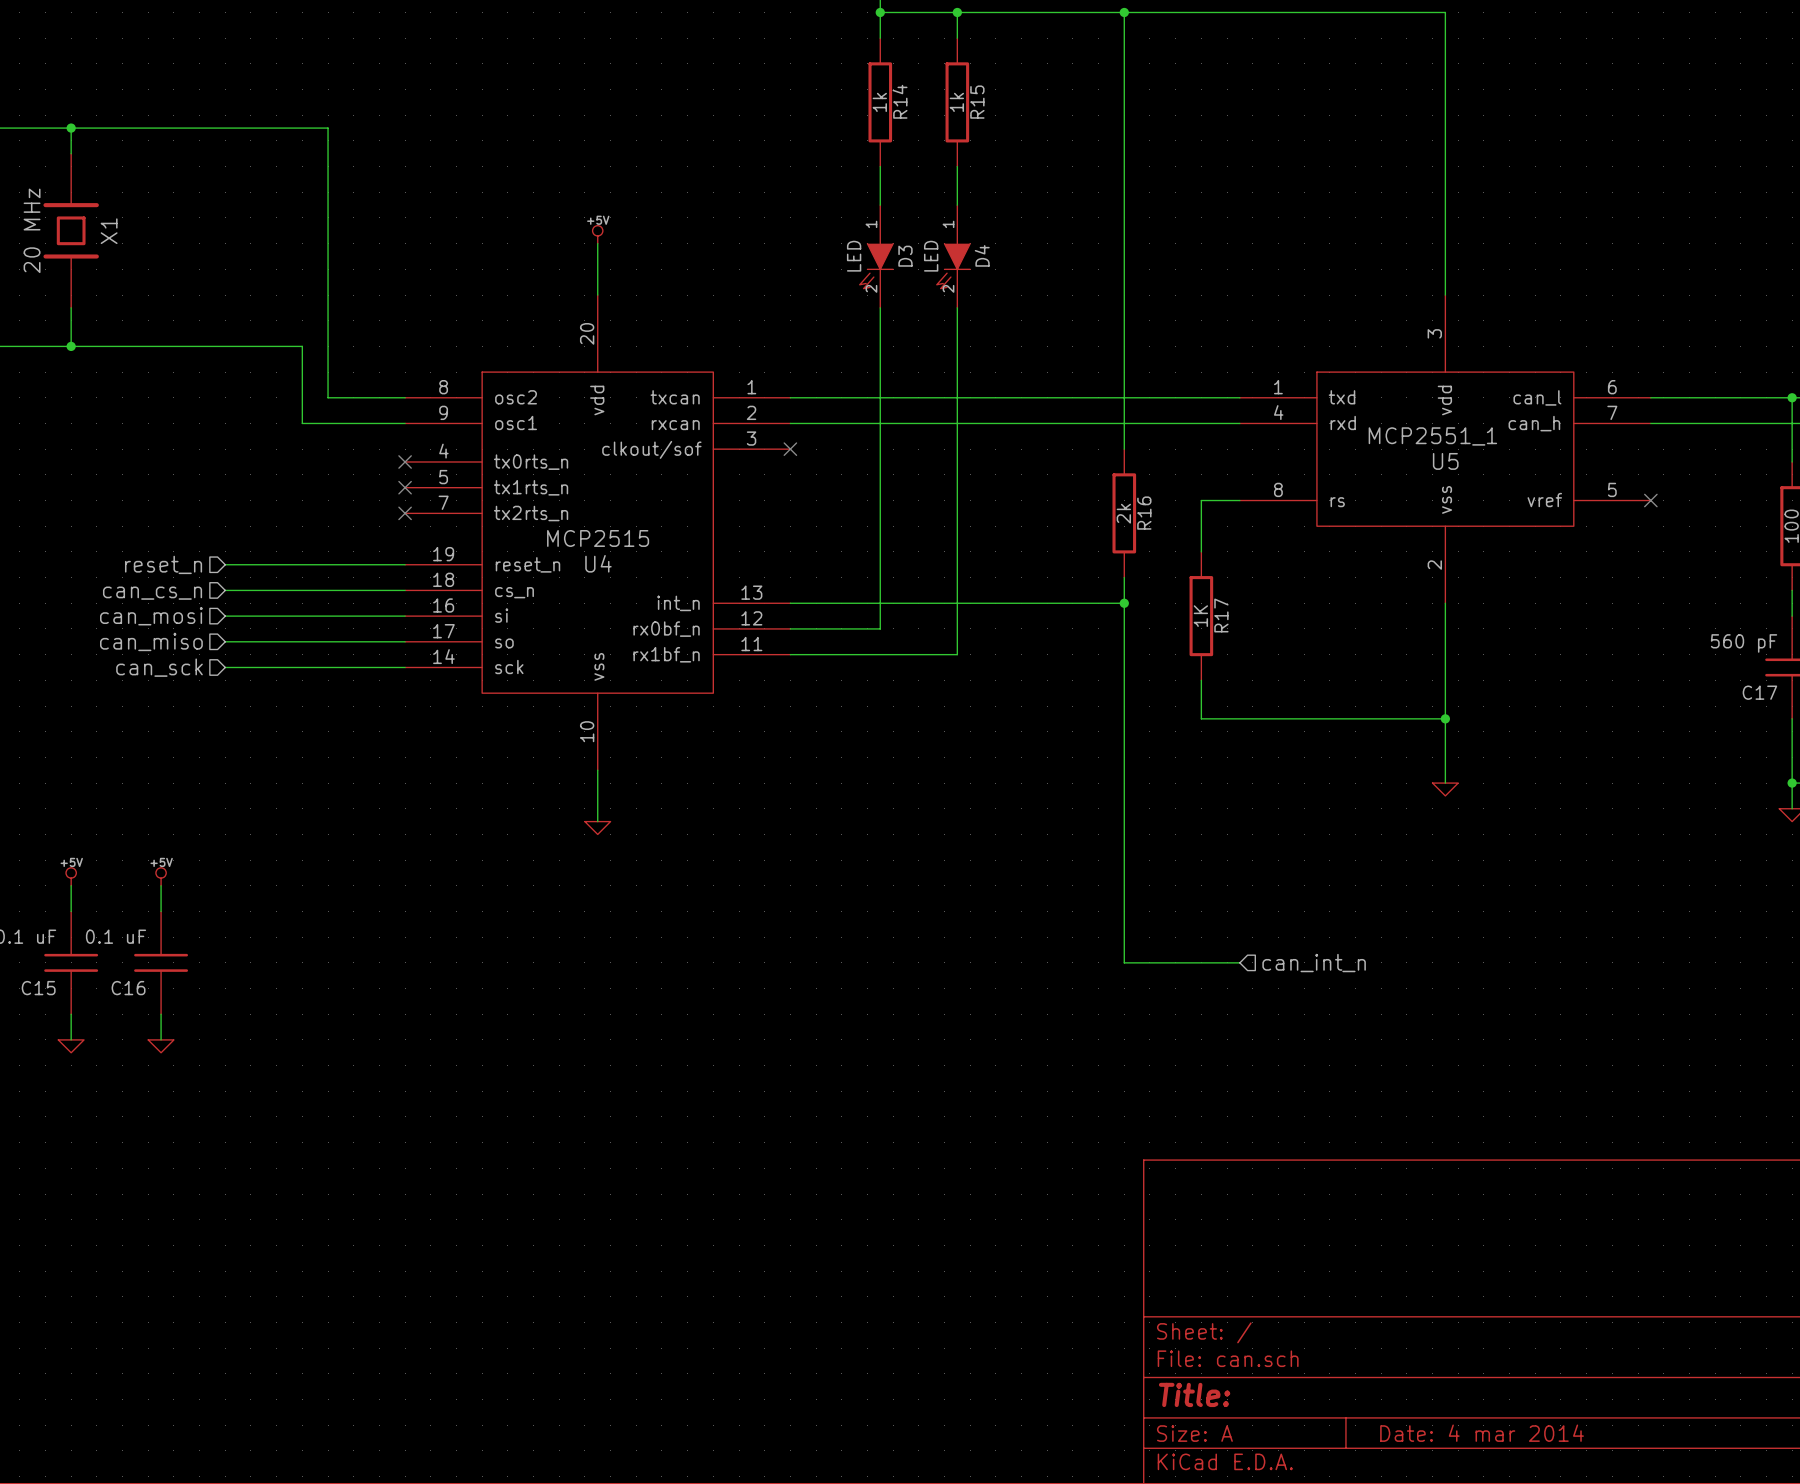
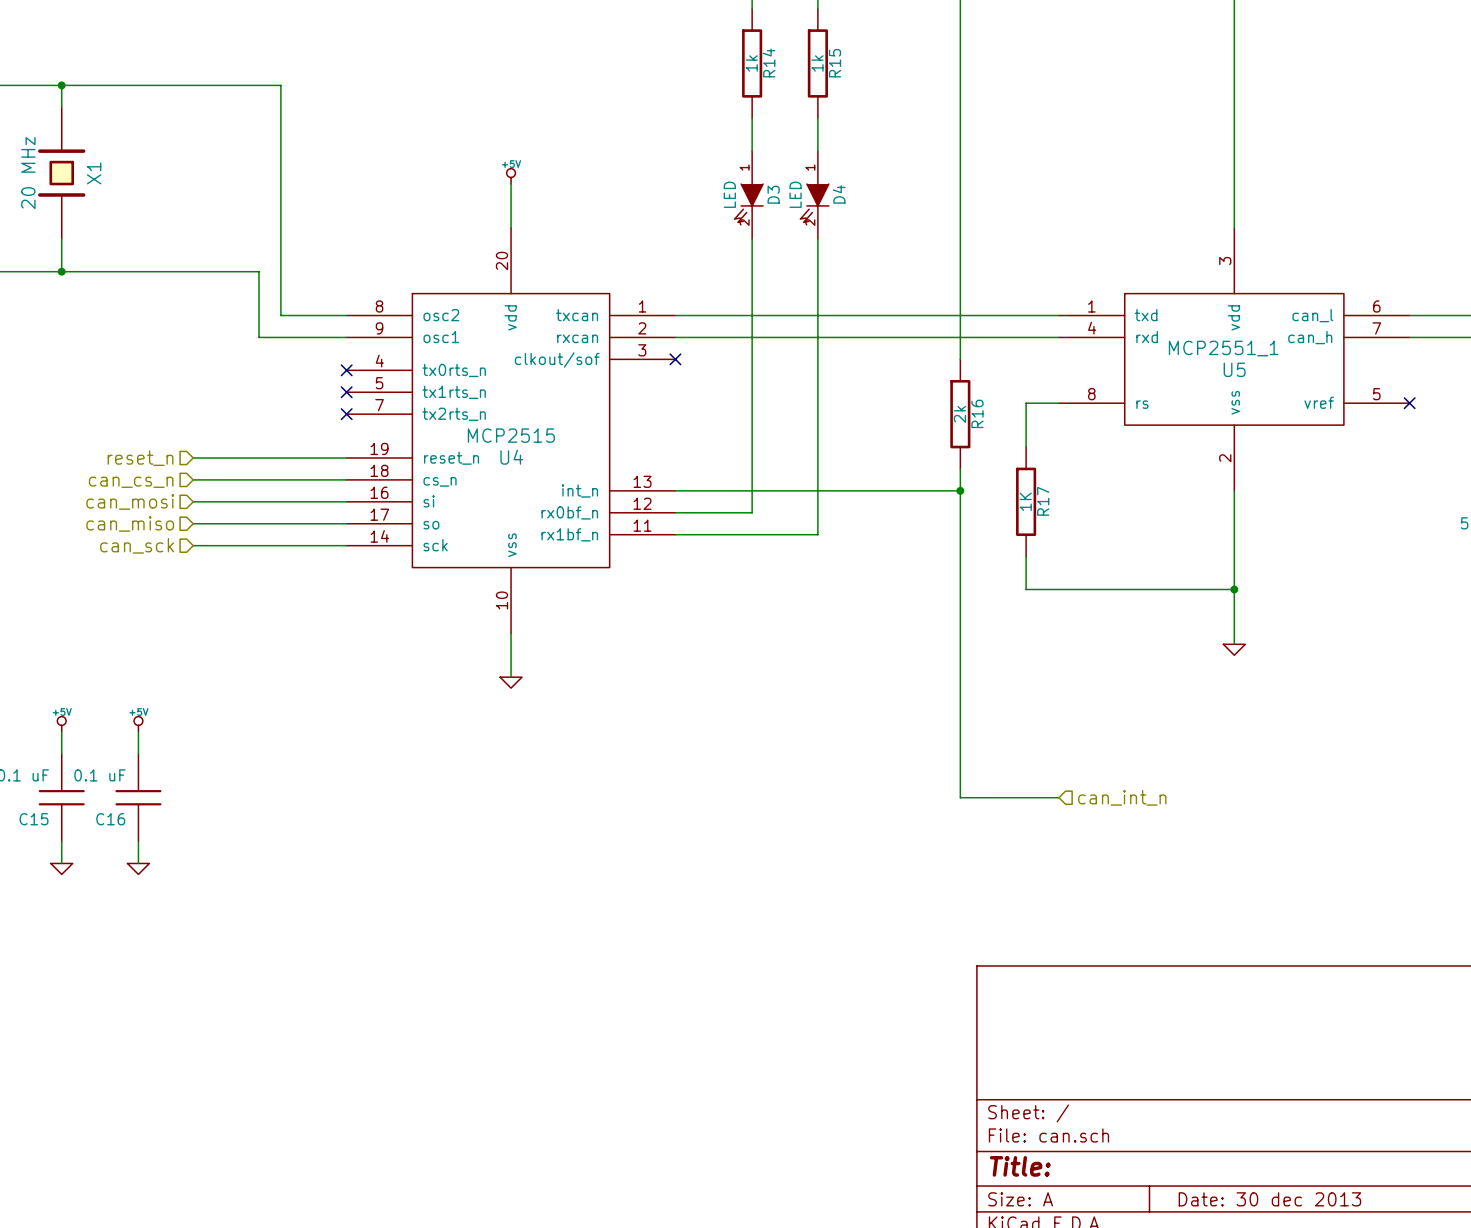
title block: Date: 4 mar 2014 (1482, 1433) -> Date: 30 dec 2013 (1269, 1199)

